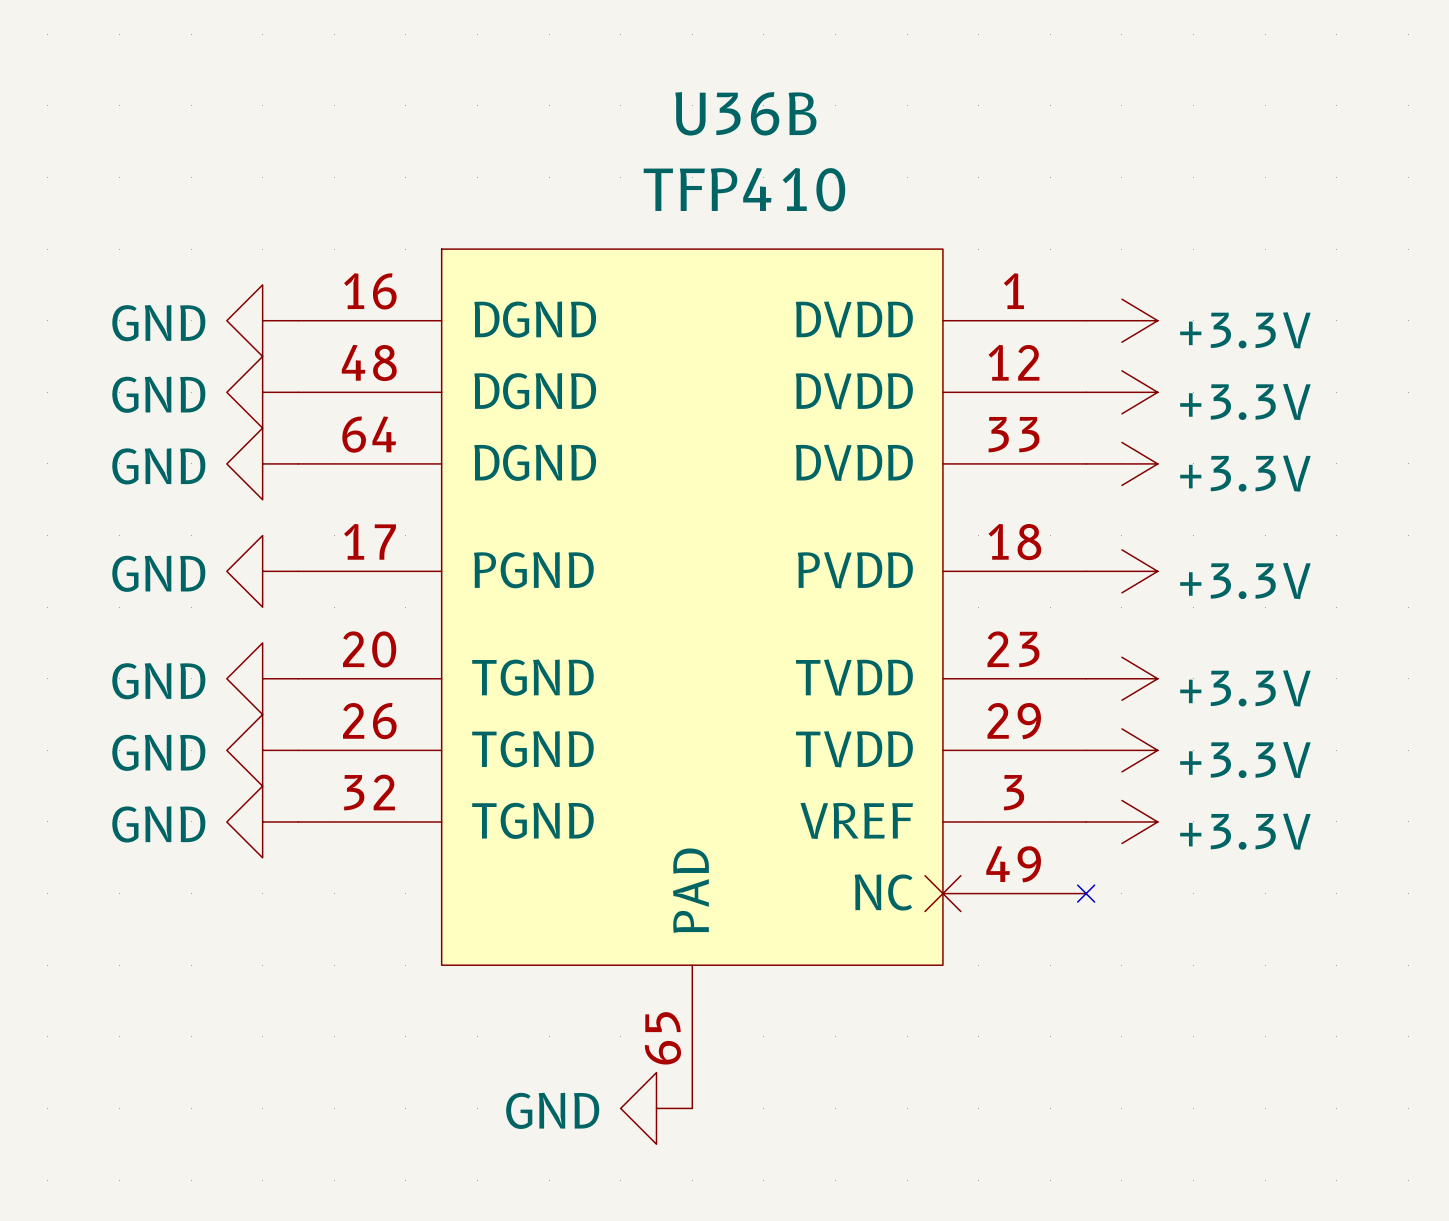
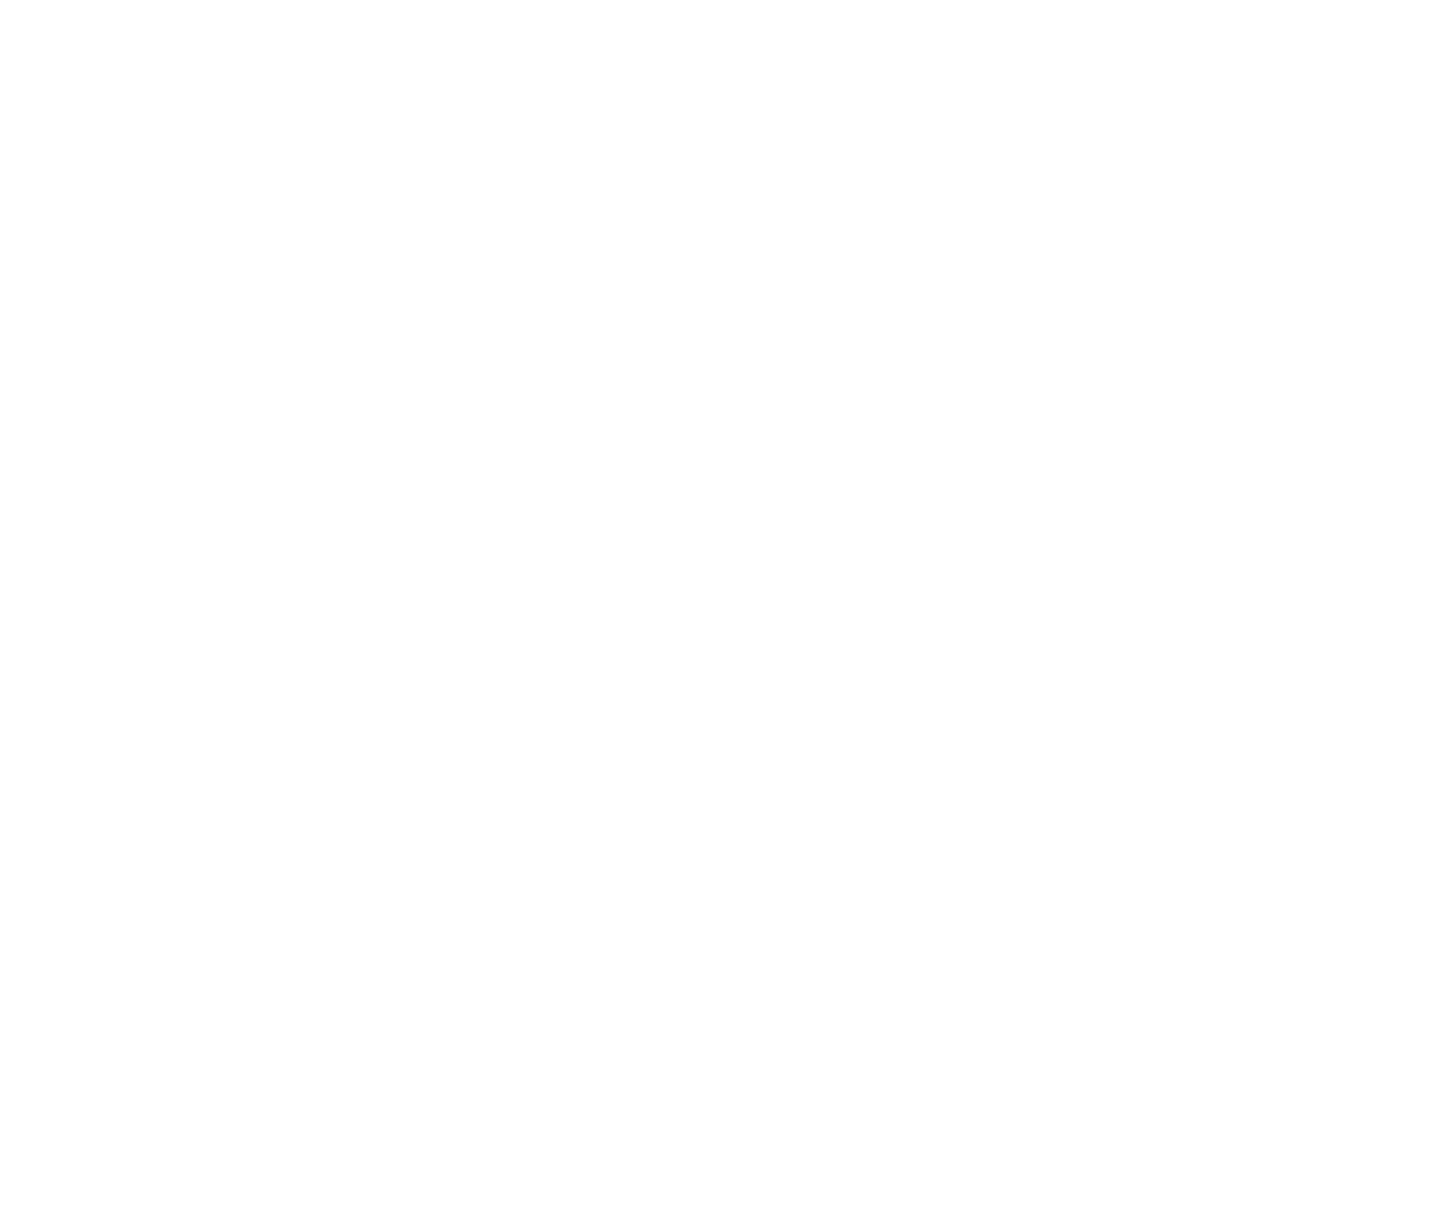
power symbol: GND (262, 320) -> none
power symbol: +3.3V (1121, 320) -> none
power symbol: GND (262, 392) -> none
power symbol: +3.3V (1121, 392) -> none
power symbol: GND (262, 463) -> none
power symbol: +3.3V (1121, 463) -> none
power symbol: GND (262, 571) -> none
power symbol: +3.3V (1121, 571) -> none
power symbol: GND (262, 678) -> none
U36B: TFP410 (696, 678) -> none
power symbol: +3.3V (1121, 678) -> none
power symbol: GND (262, 750) -> none
power symbol: +3.3V (1121, 750) -> none
power symbol: GND (262, 821) -> none
power symbol: +3.3V (1121, 821) -> none
power symbol: GND (656, 1108) -> none

